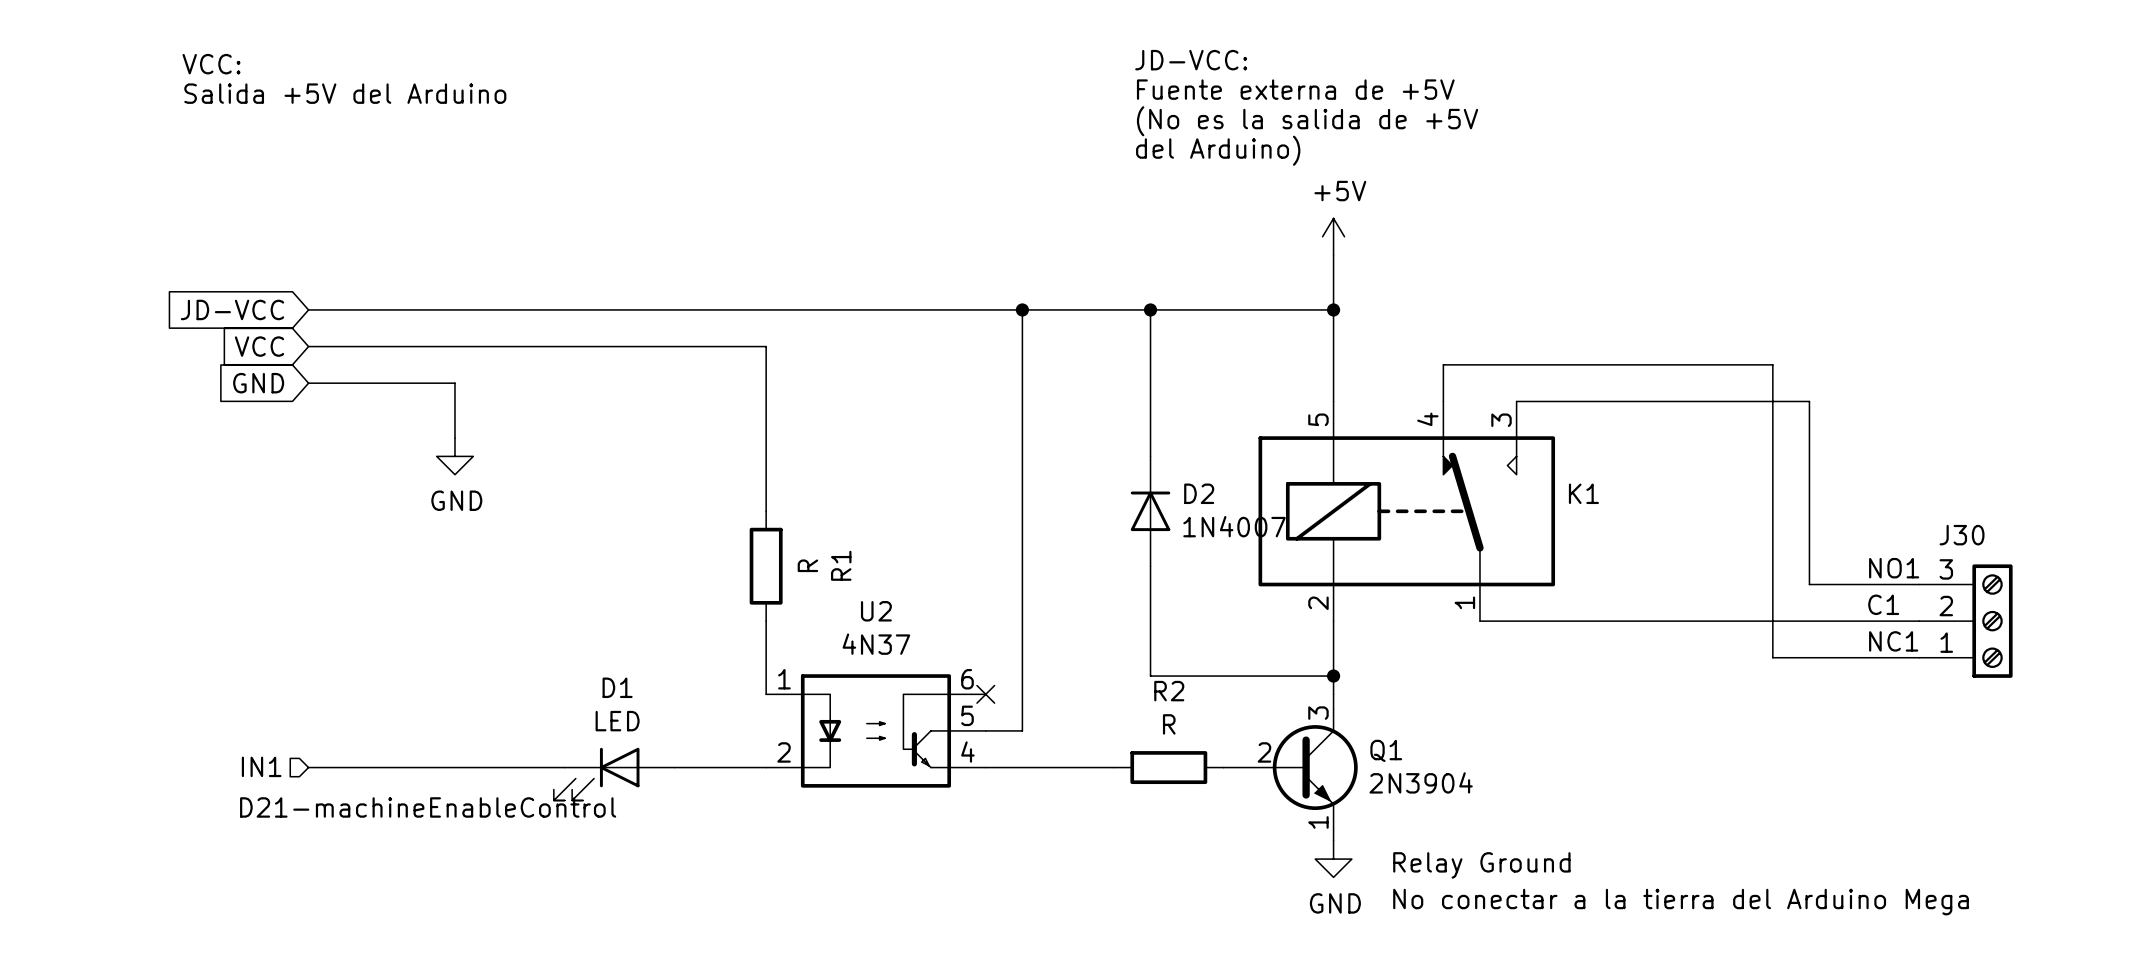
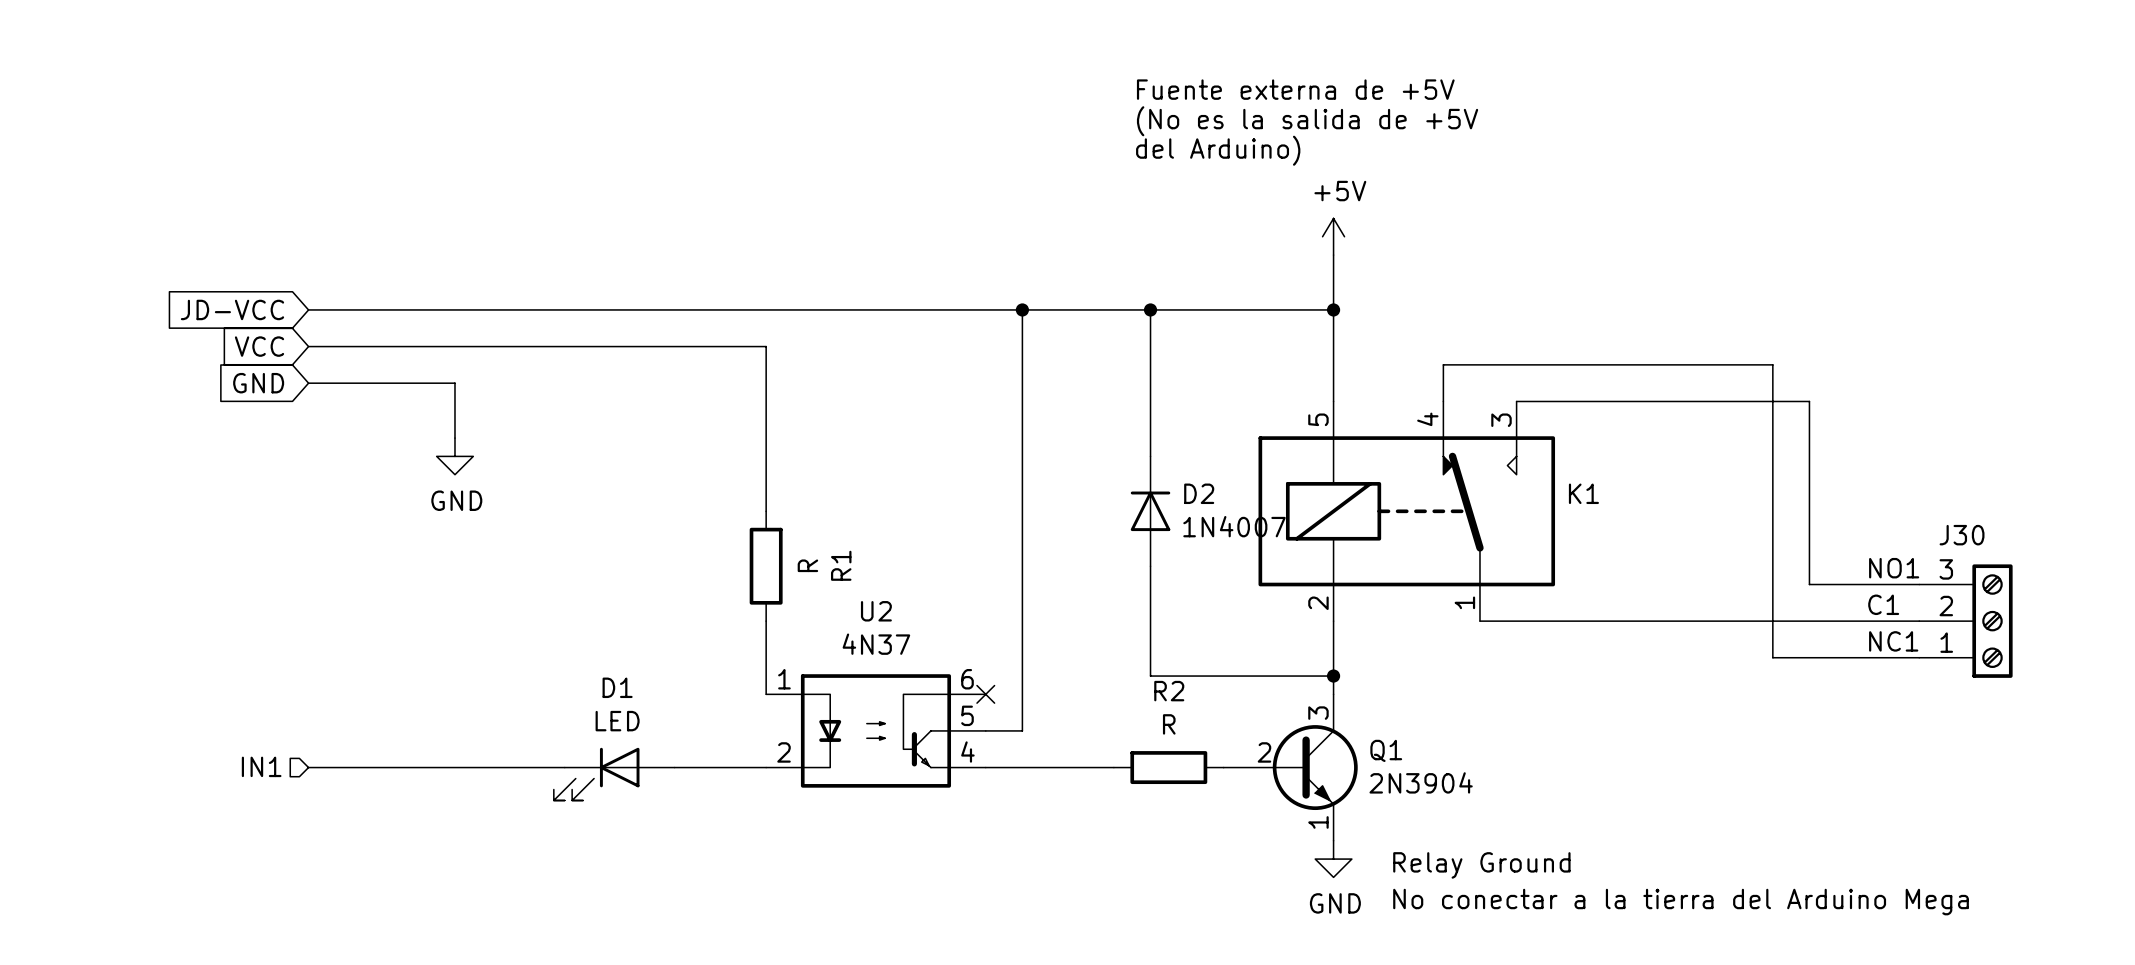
text: JD-VCC: (1191, 60) -> none
text: VCC: (211, 64) -> none
text: Salida +5V del Arduino (345, 93) -> none
text: D21-machineEnableControl (428, 807) -> none

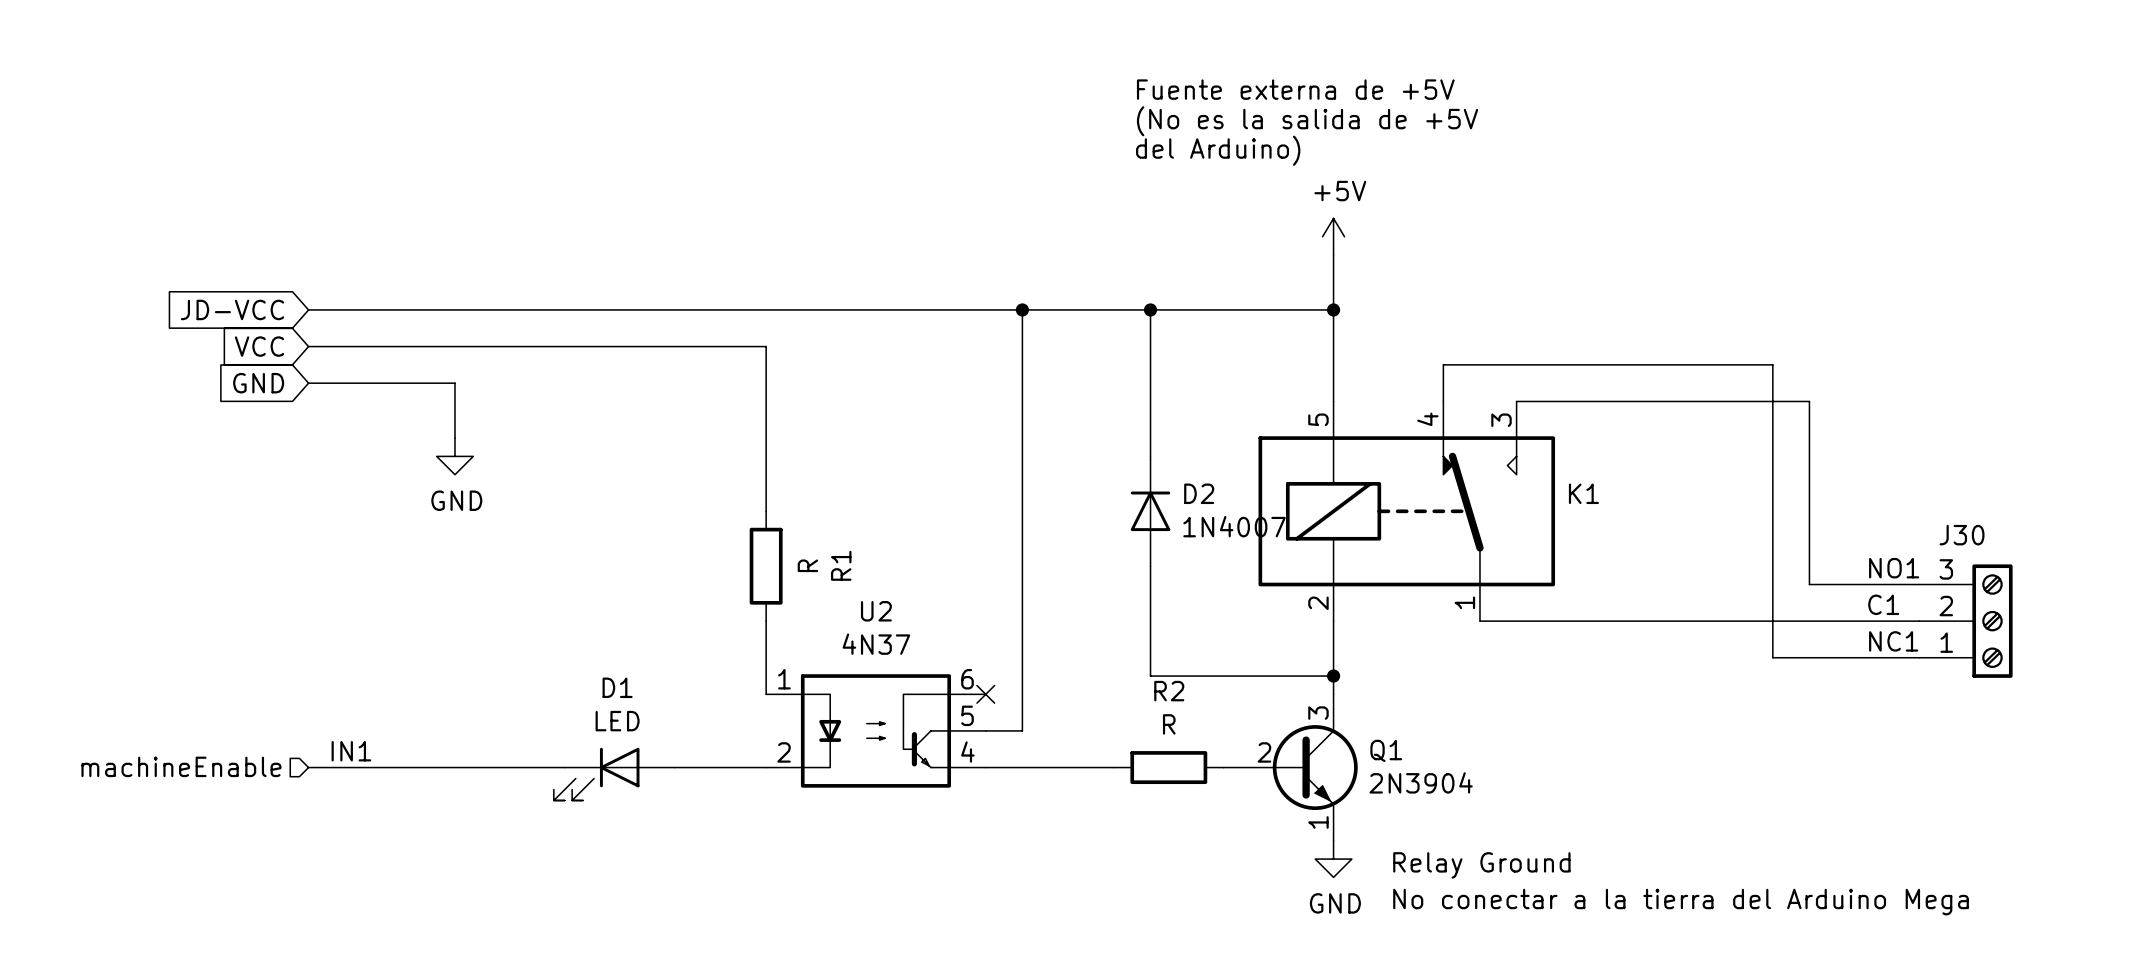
label: none -> IN1 (351, 751)
hierarchical label: IN1 (261, 766) -> machineEnable (181, 766)

